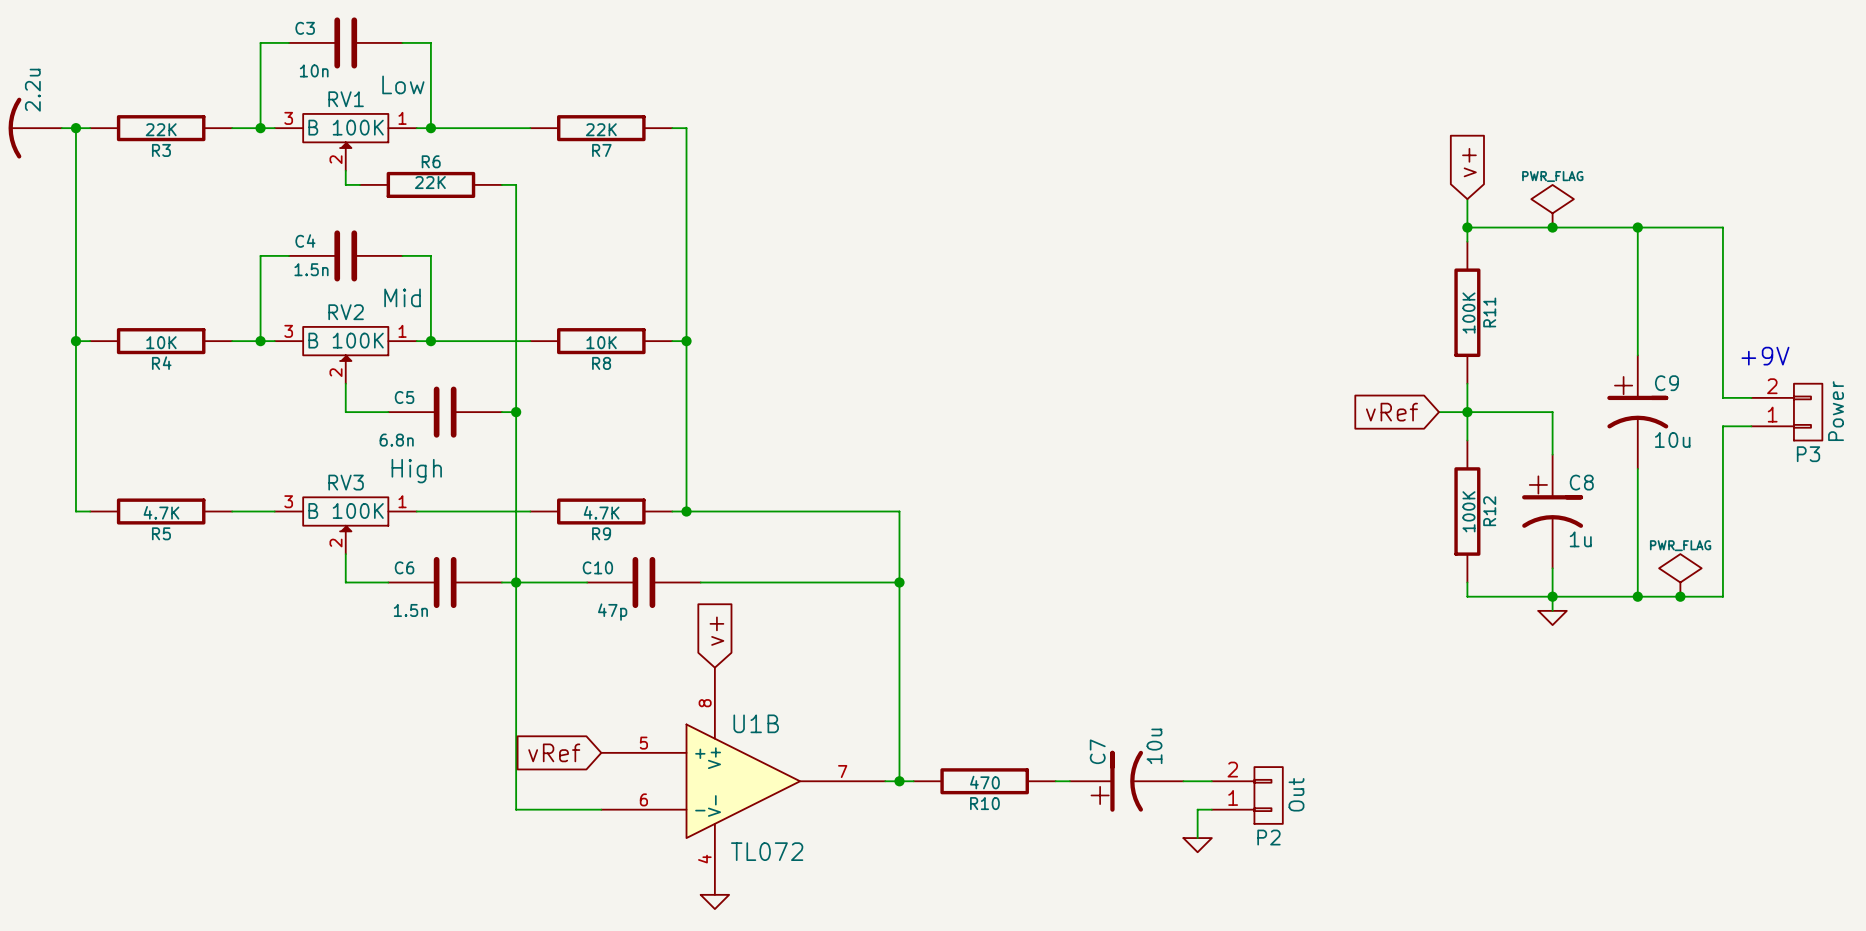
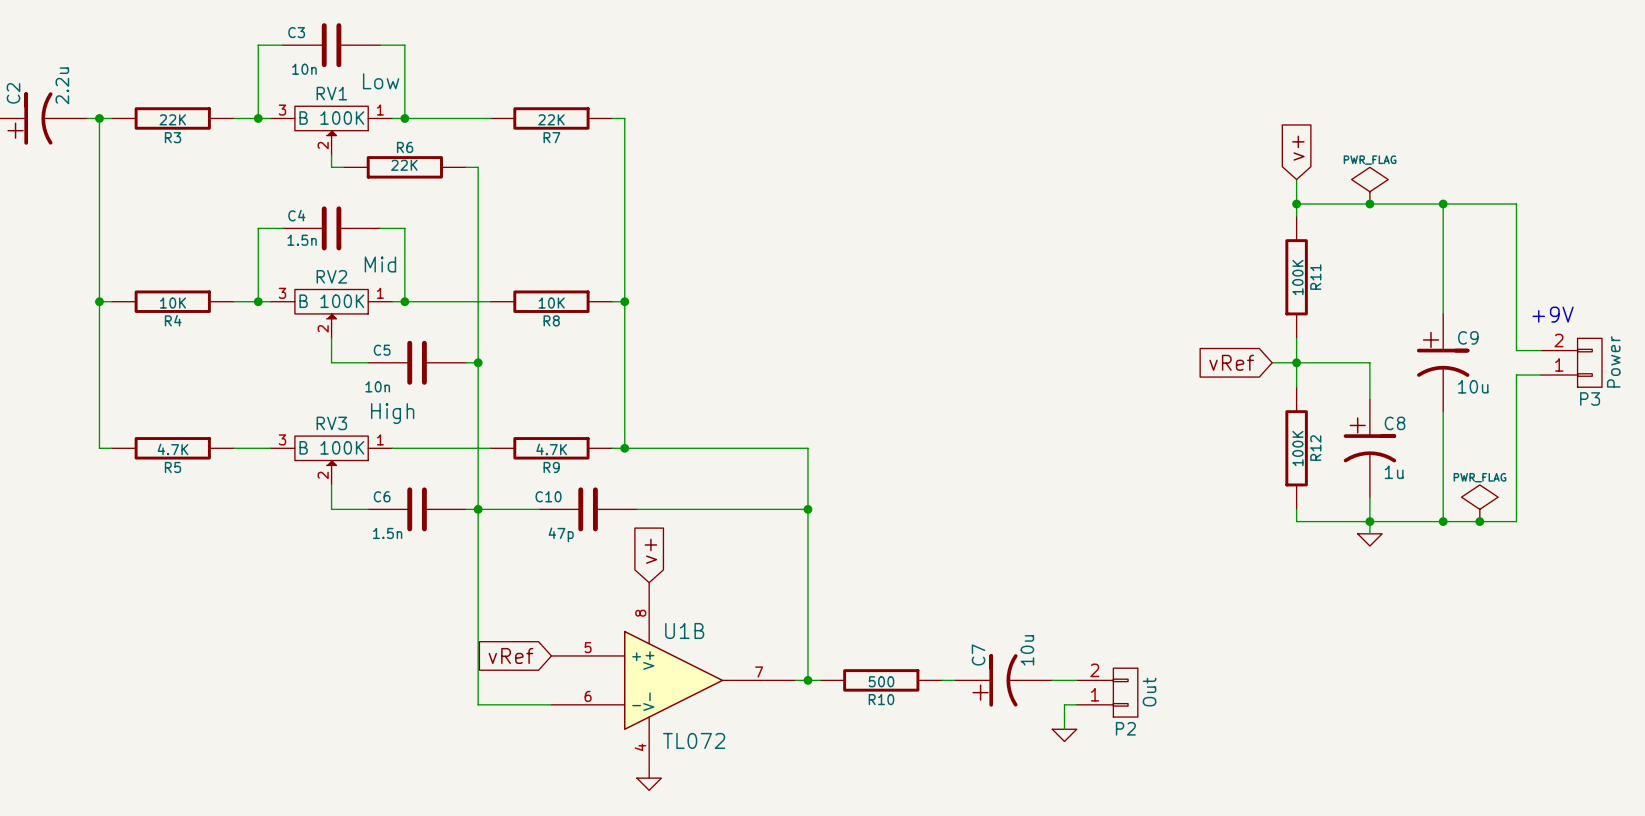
C5 value: 6.8n (396, 440) -> 10n (377, 386)
R10 value: 470 (984, 782) -> 500 (881, 681)

